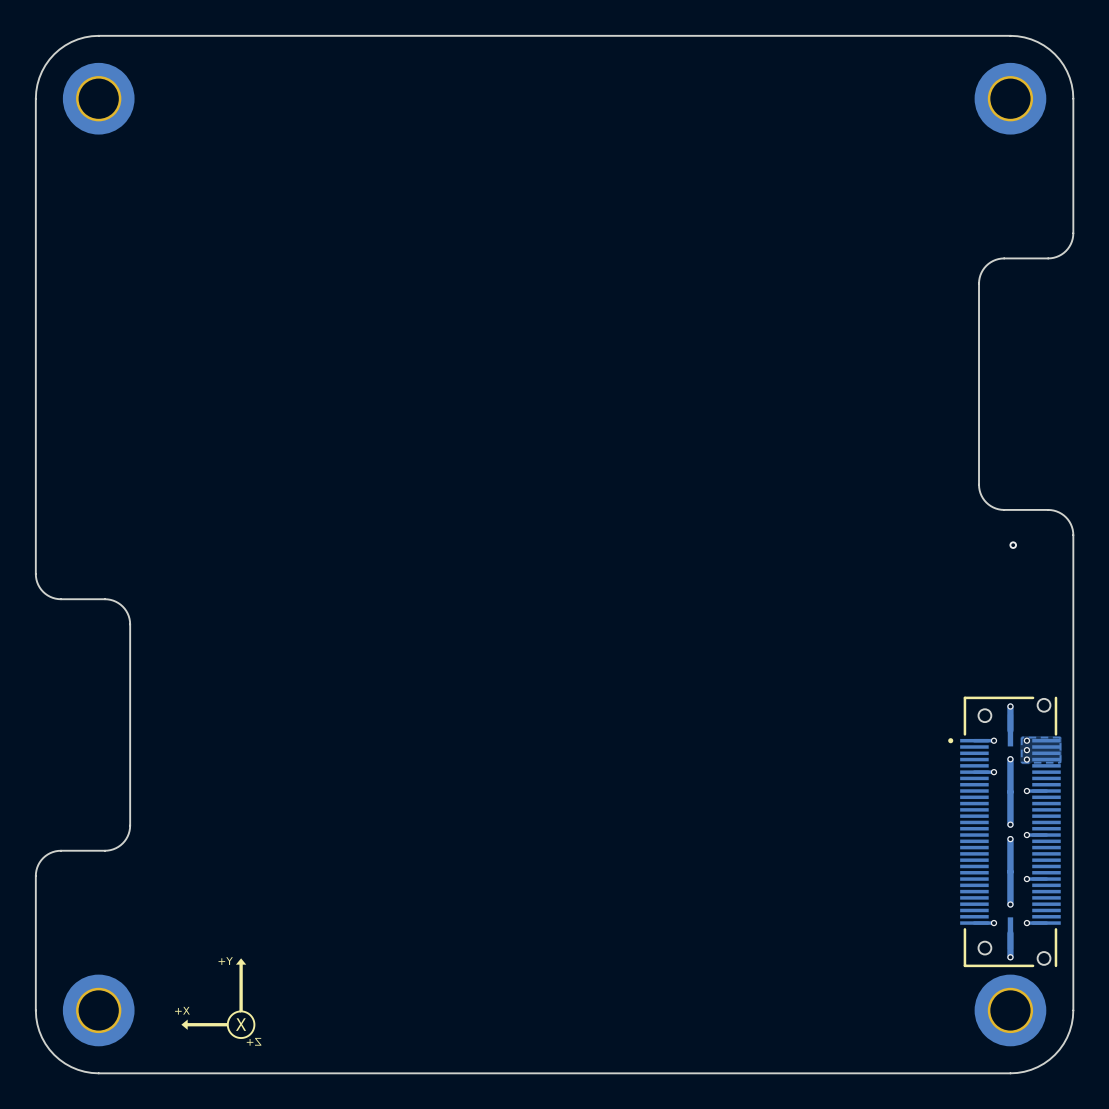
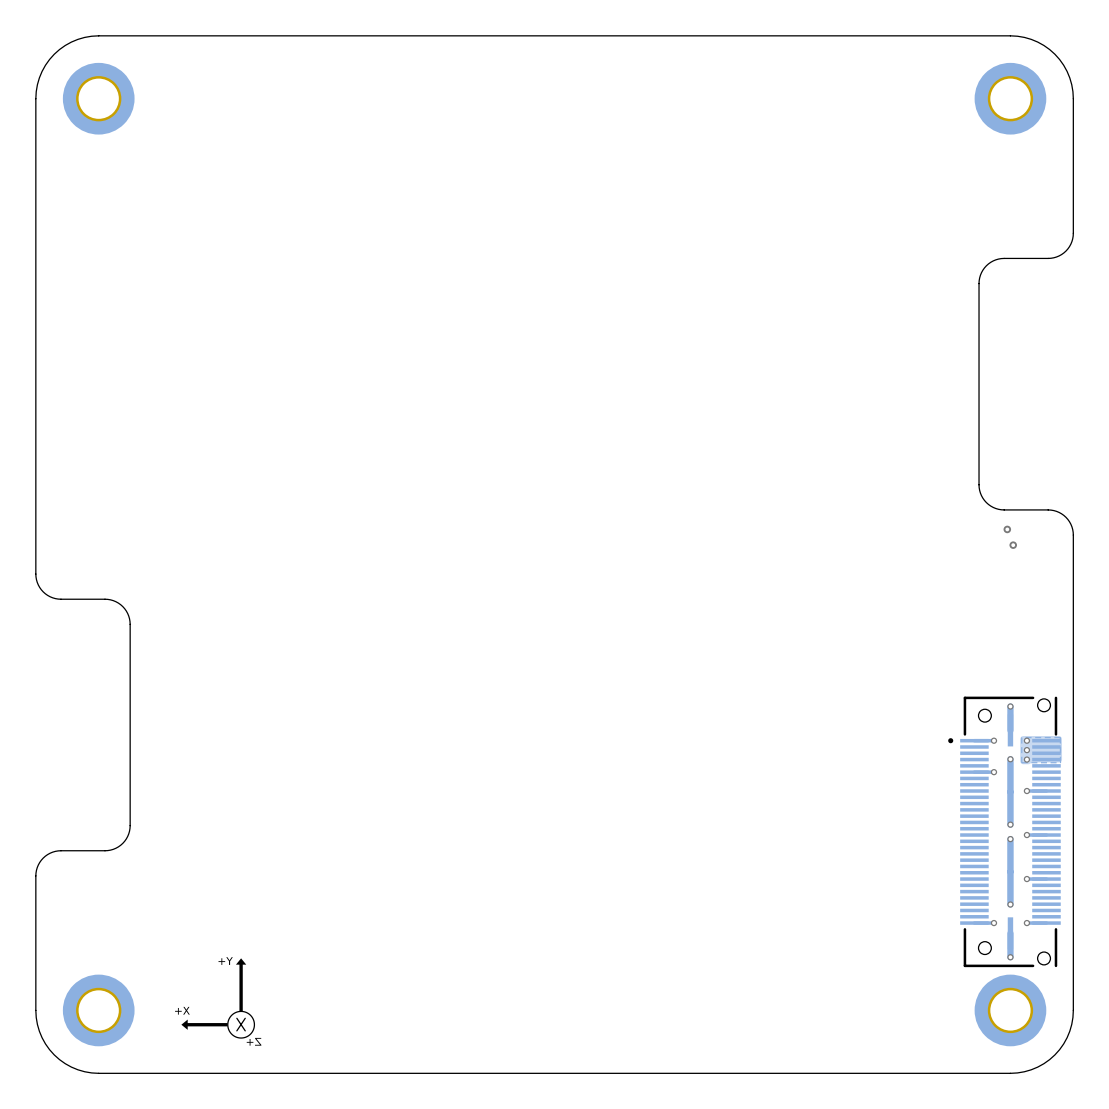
via: none -> (1007, 529)

